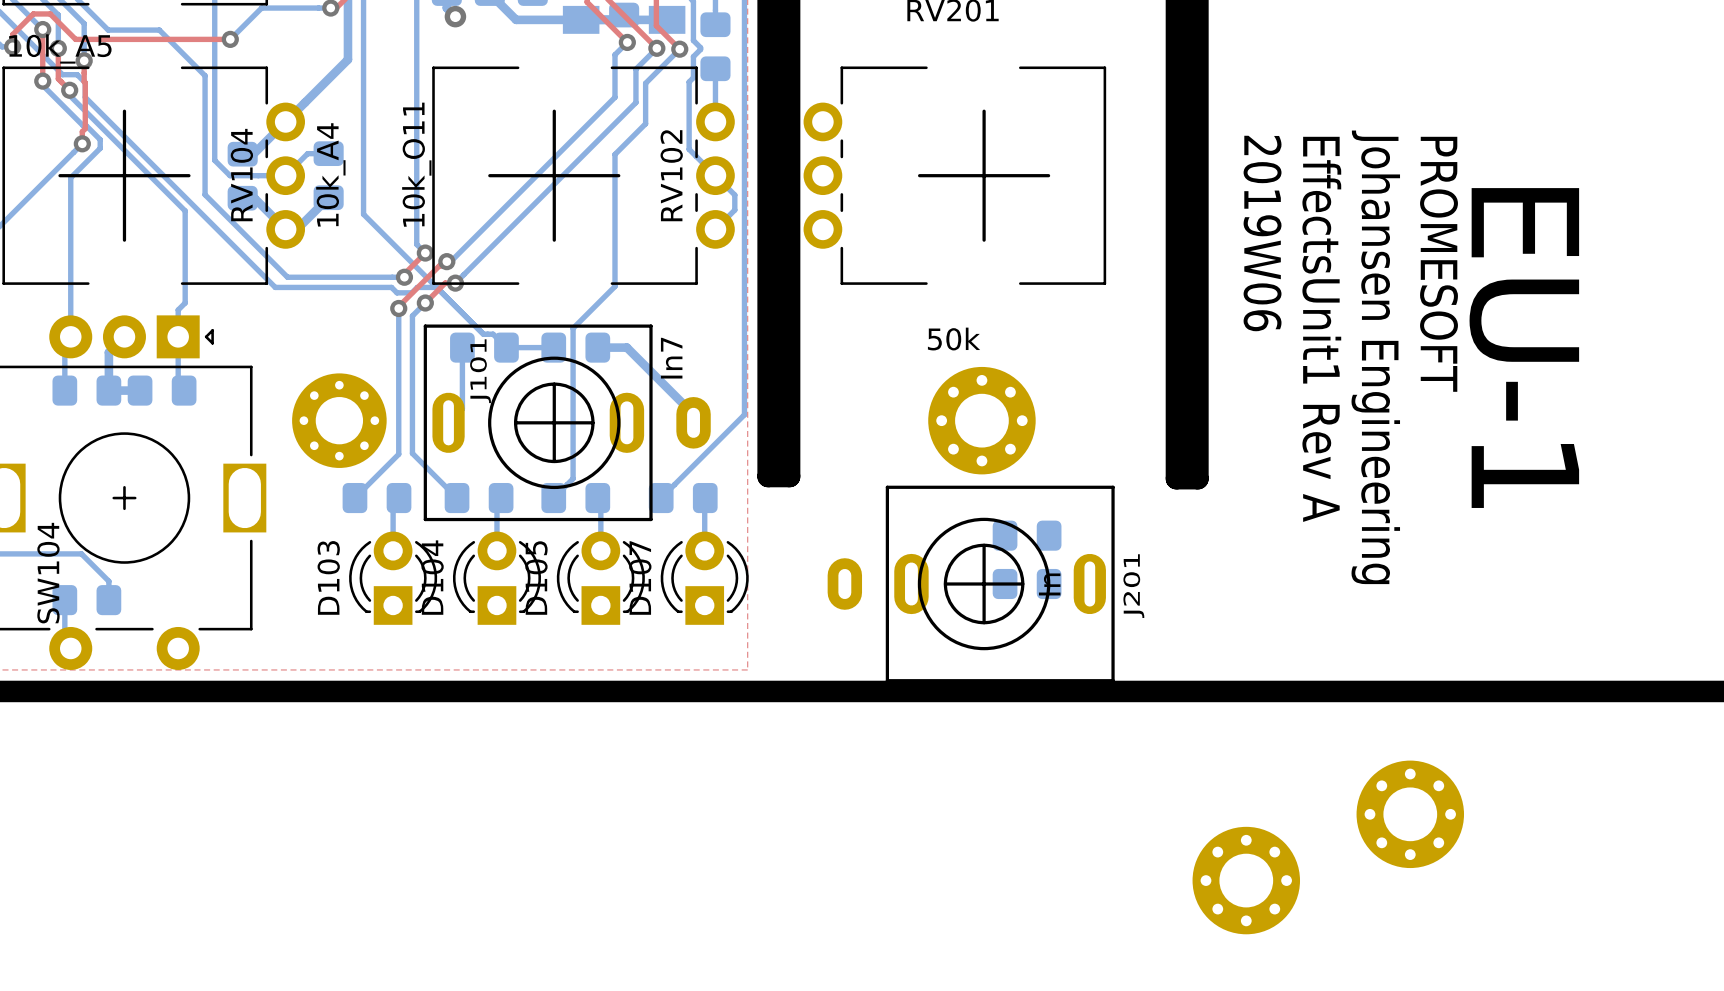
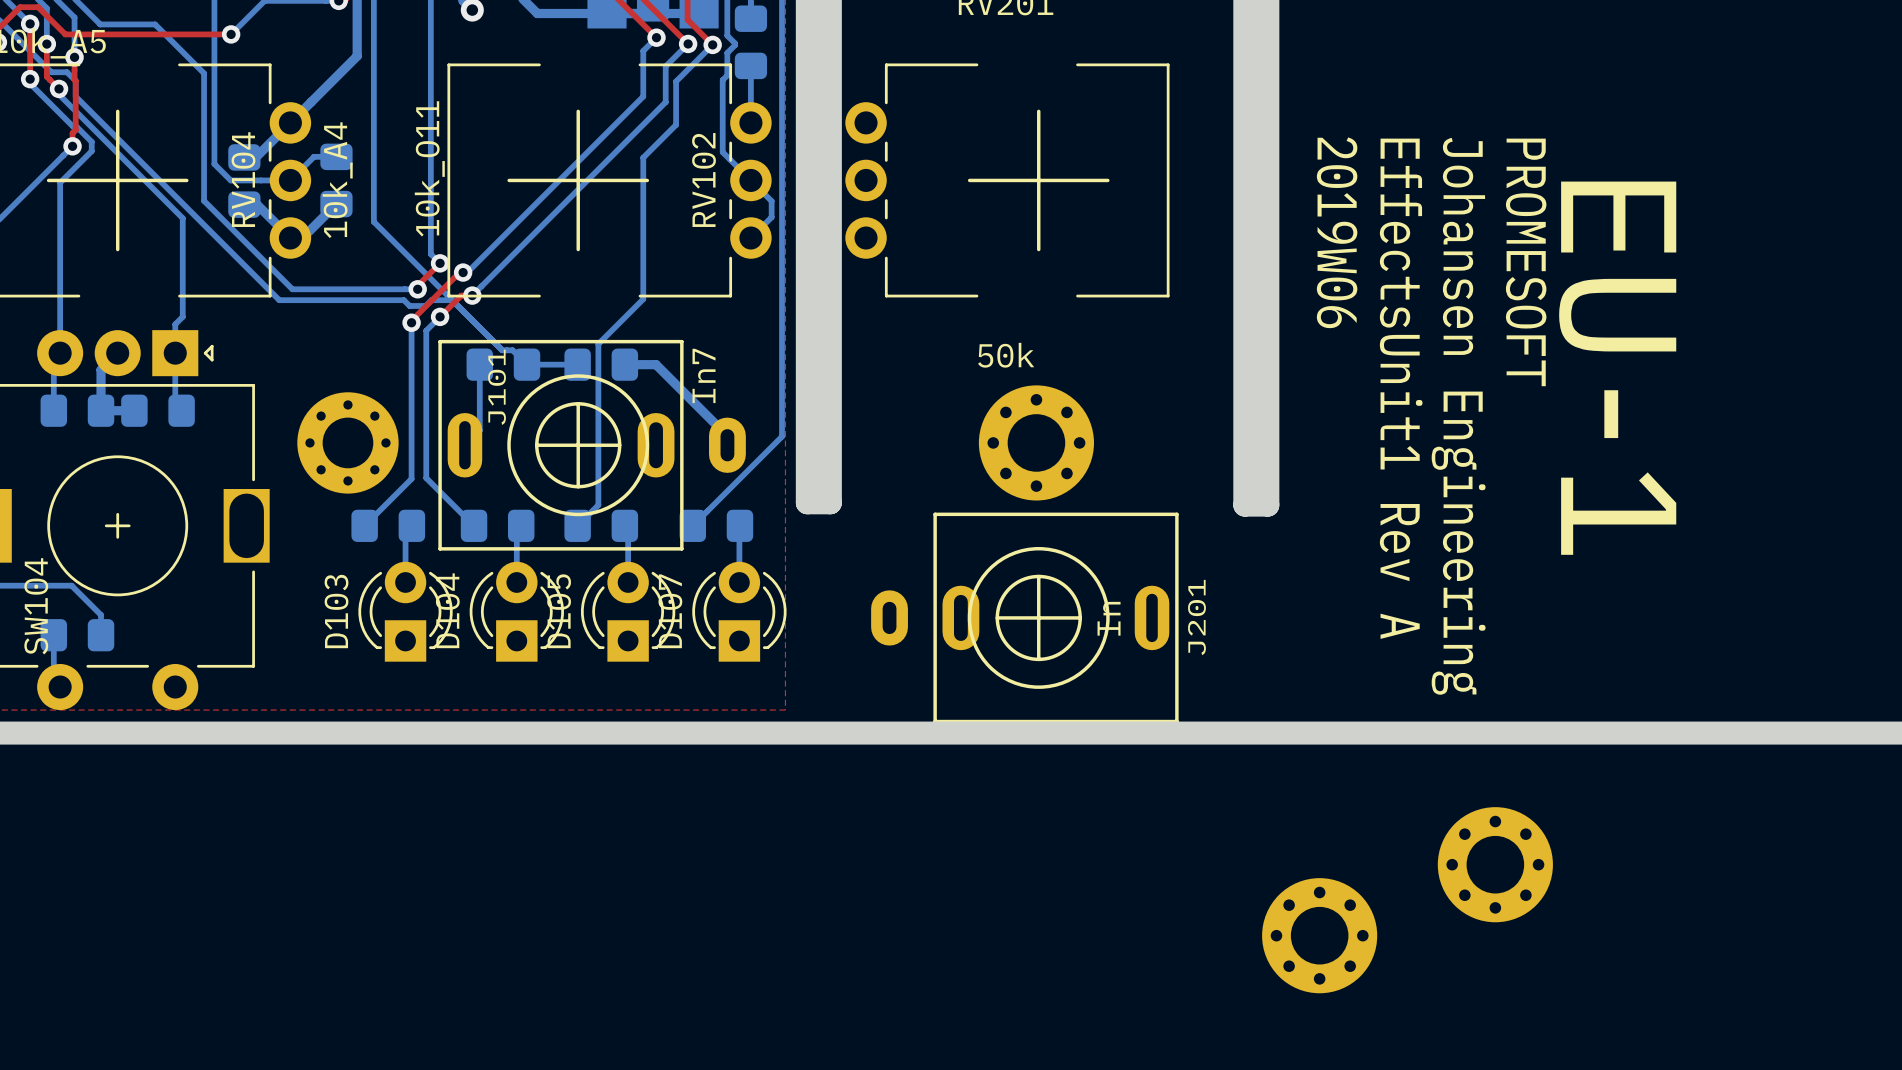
part: (1027, 535) -> none
part: (1027, 584) -> none

